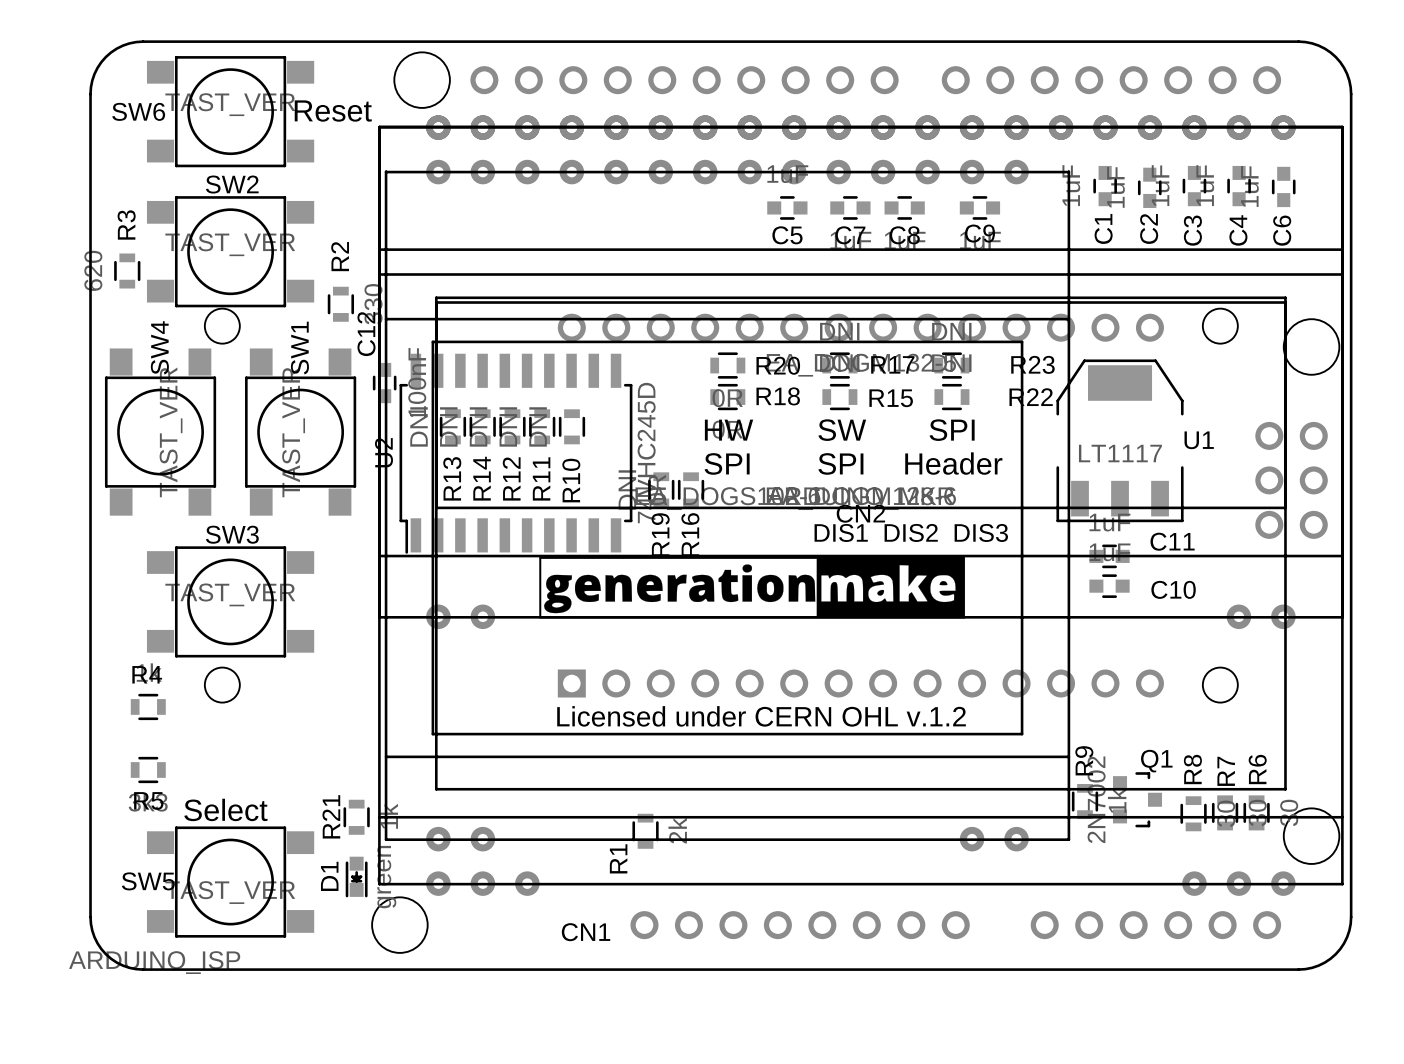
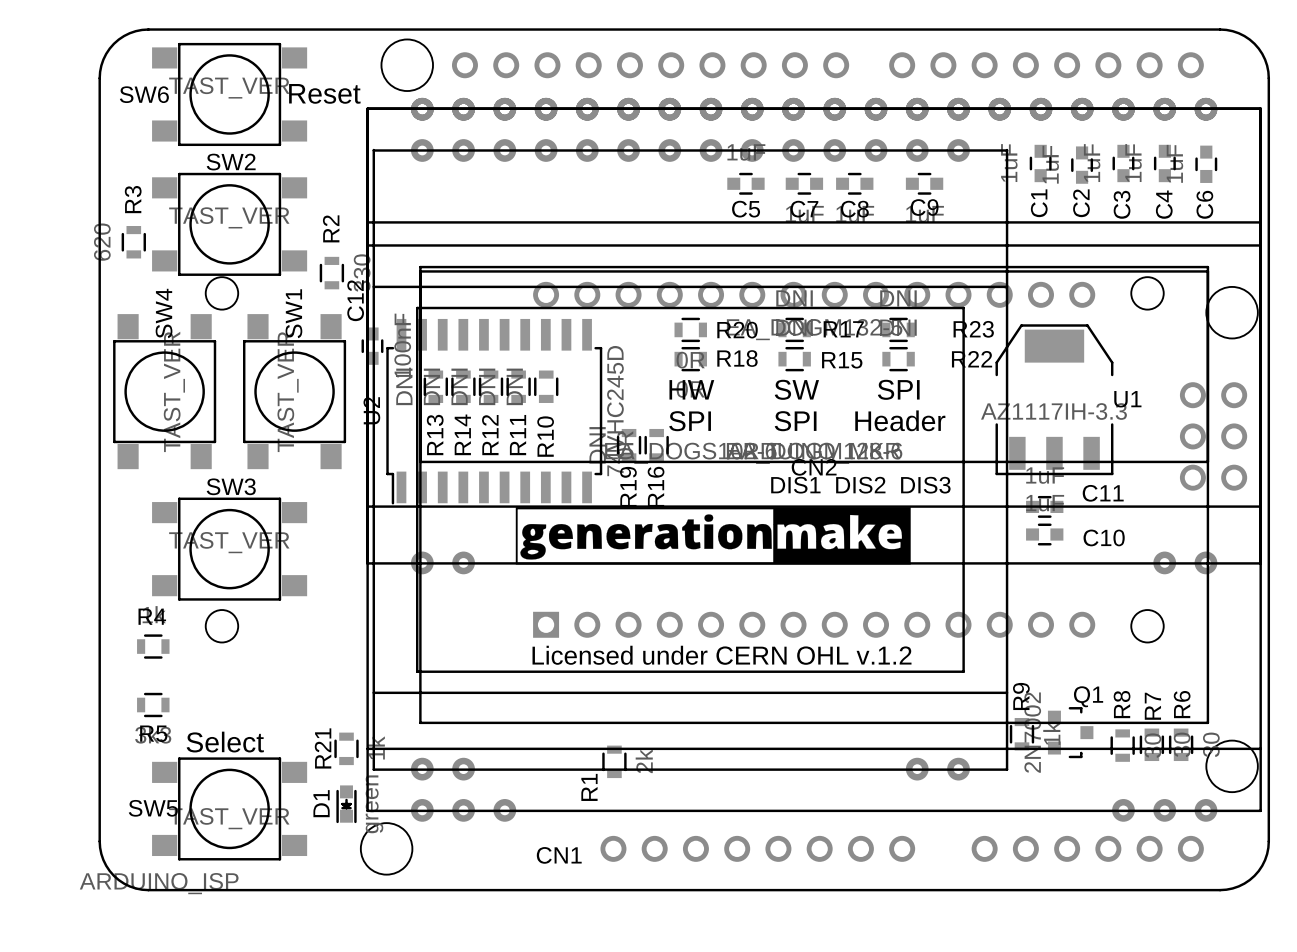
U1 value: LT1117 (1120, 453) -> AZ1117IH-3.3 (1053, 411)

